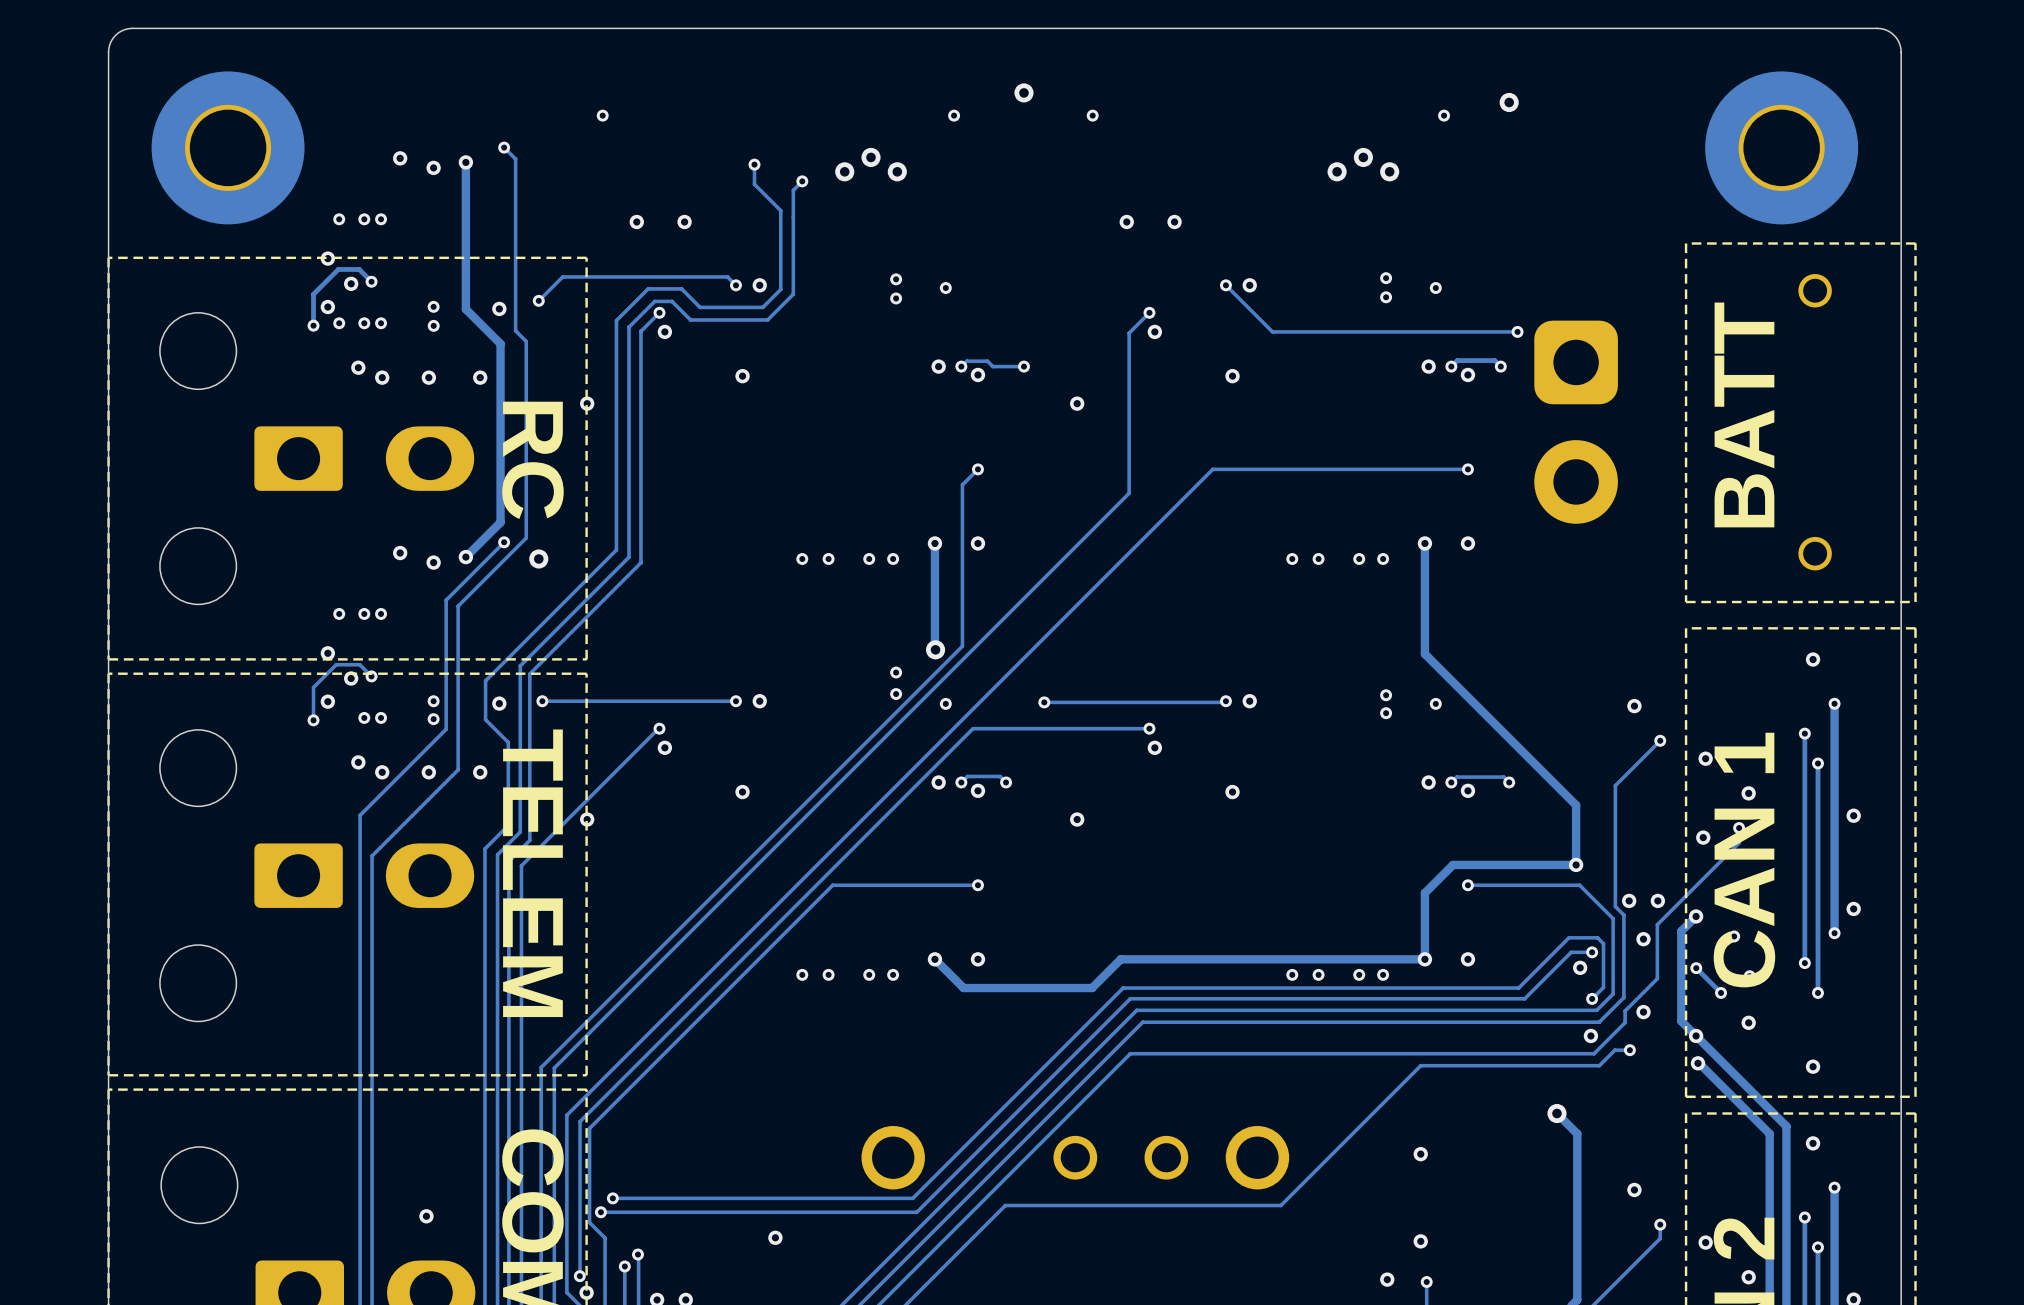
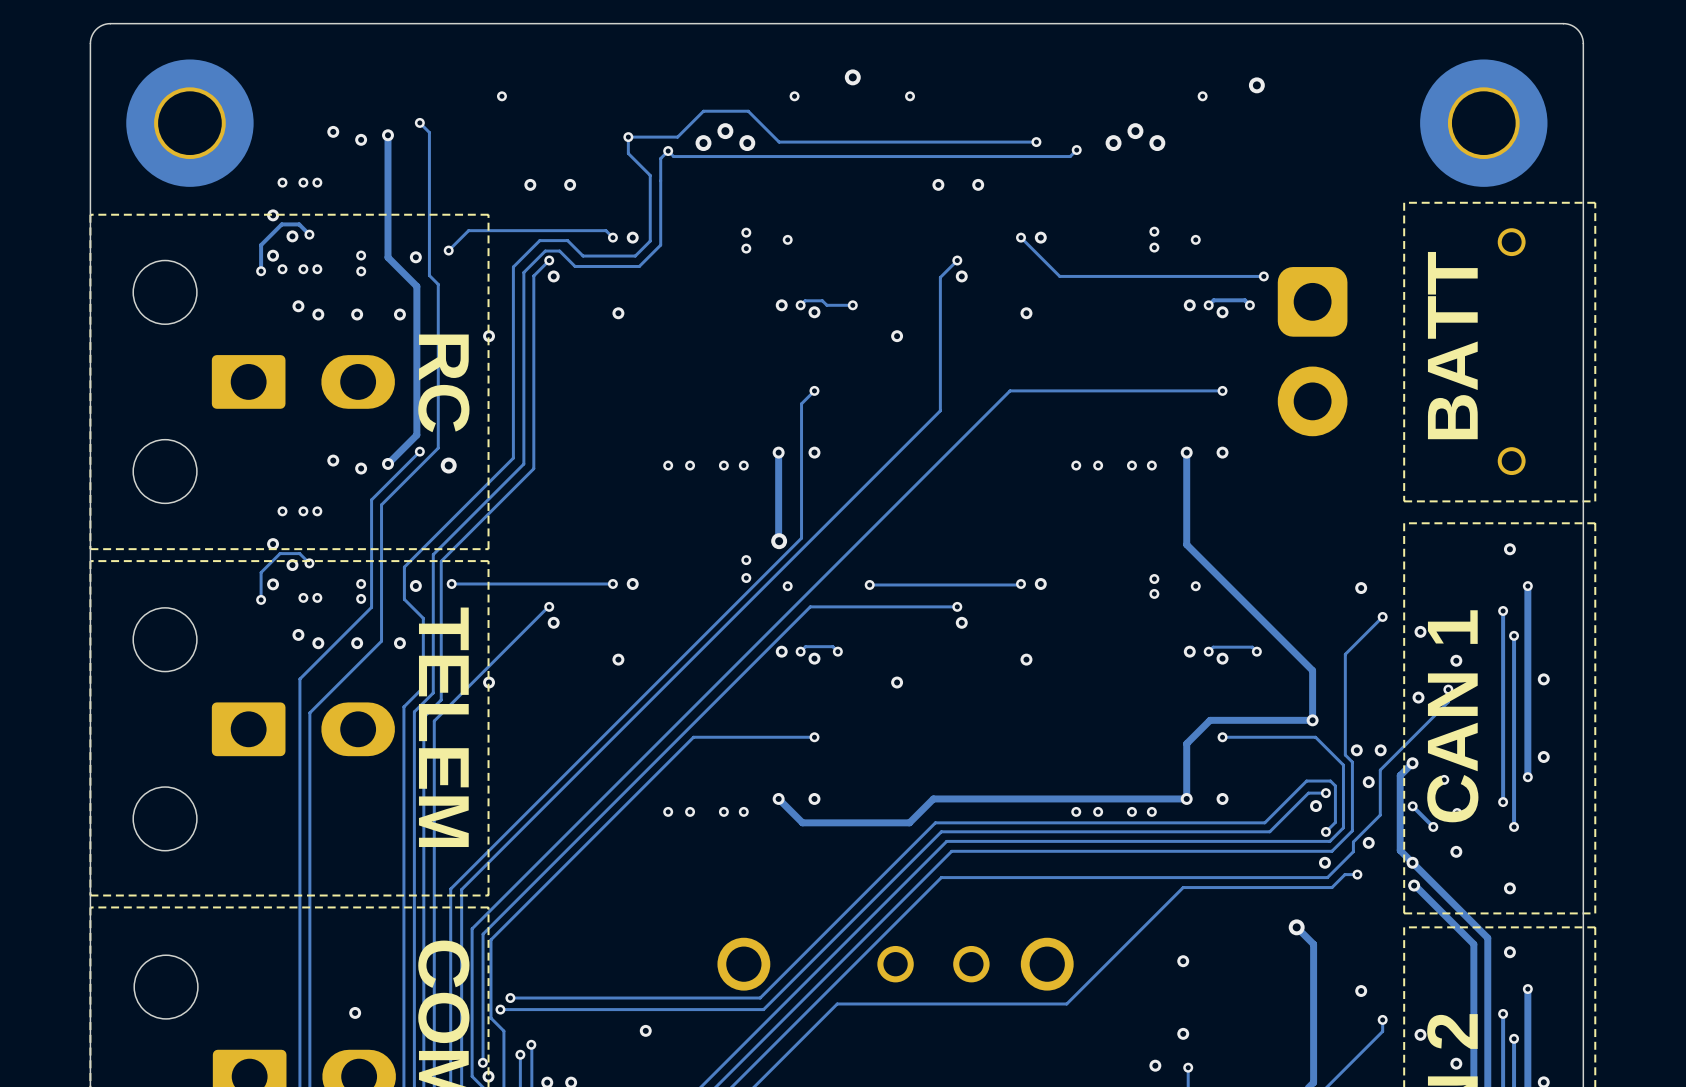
track: none -> (628, 137) (677, 137) (703, 111) (748, 111) (779, 142) (1036, 142)
via: none -> (1036, 142)
track: none -> (1076, 150) (1070, 156) (673, 156) (668, 151)
via: none -> (1076, 150)

